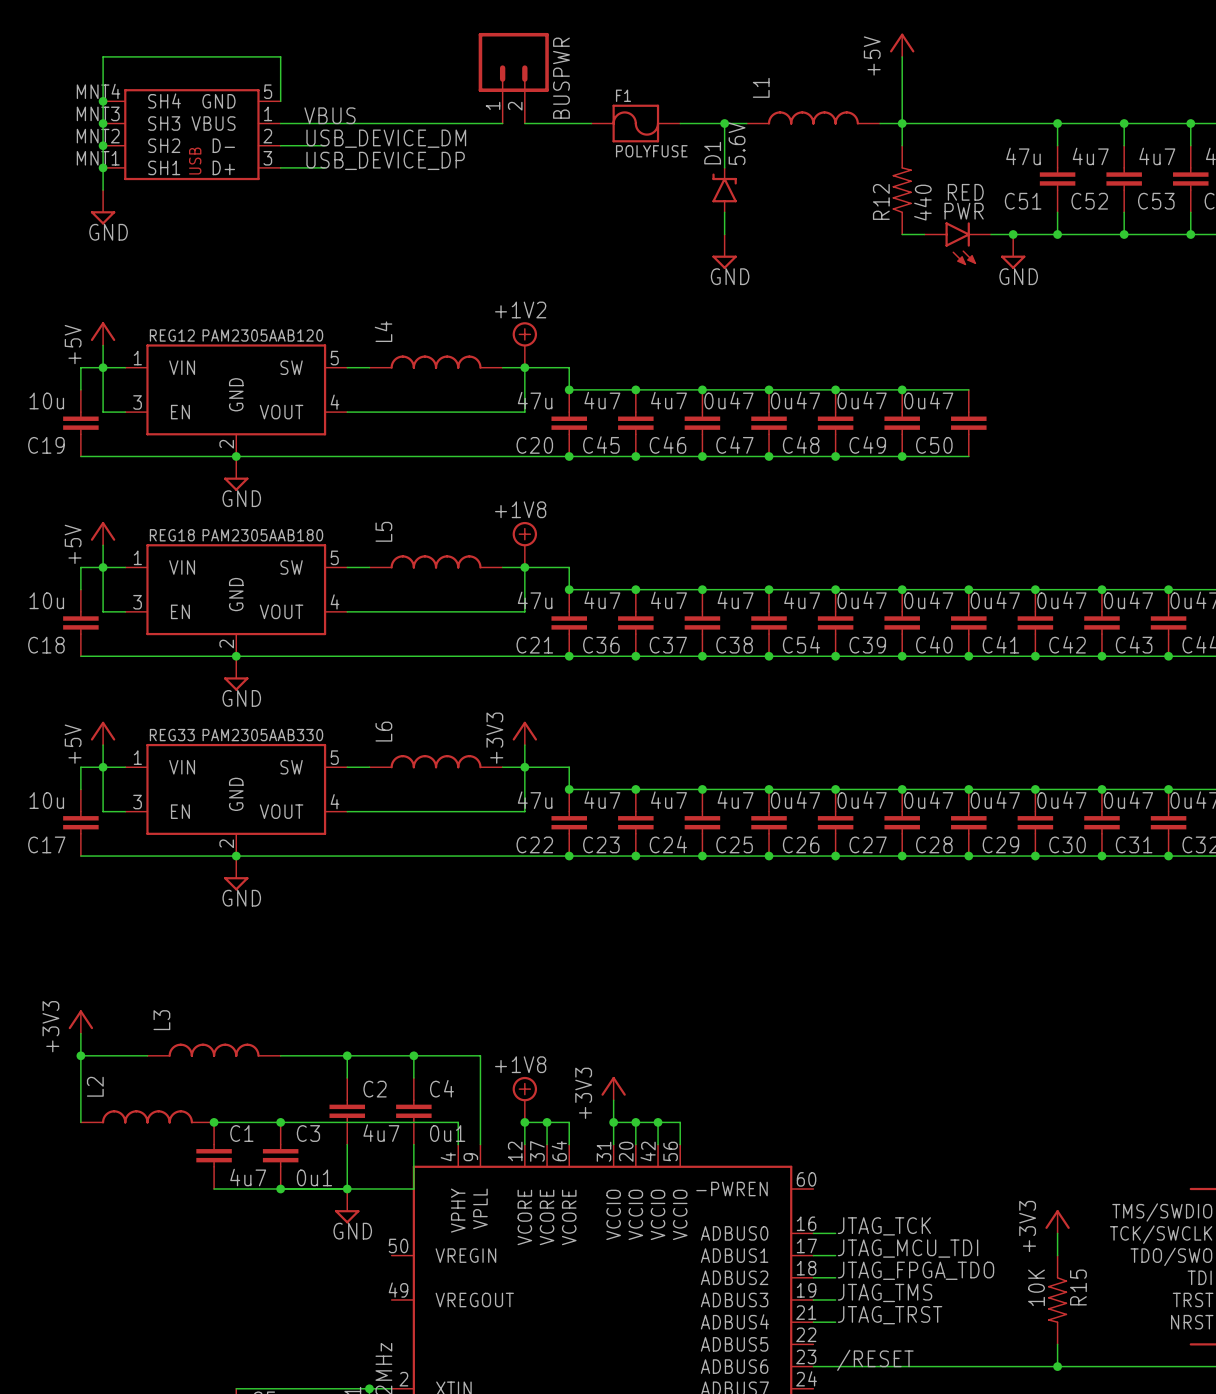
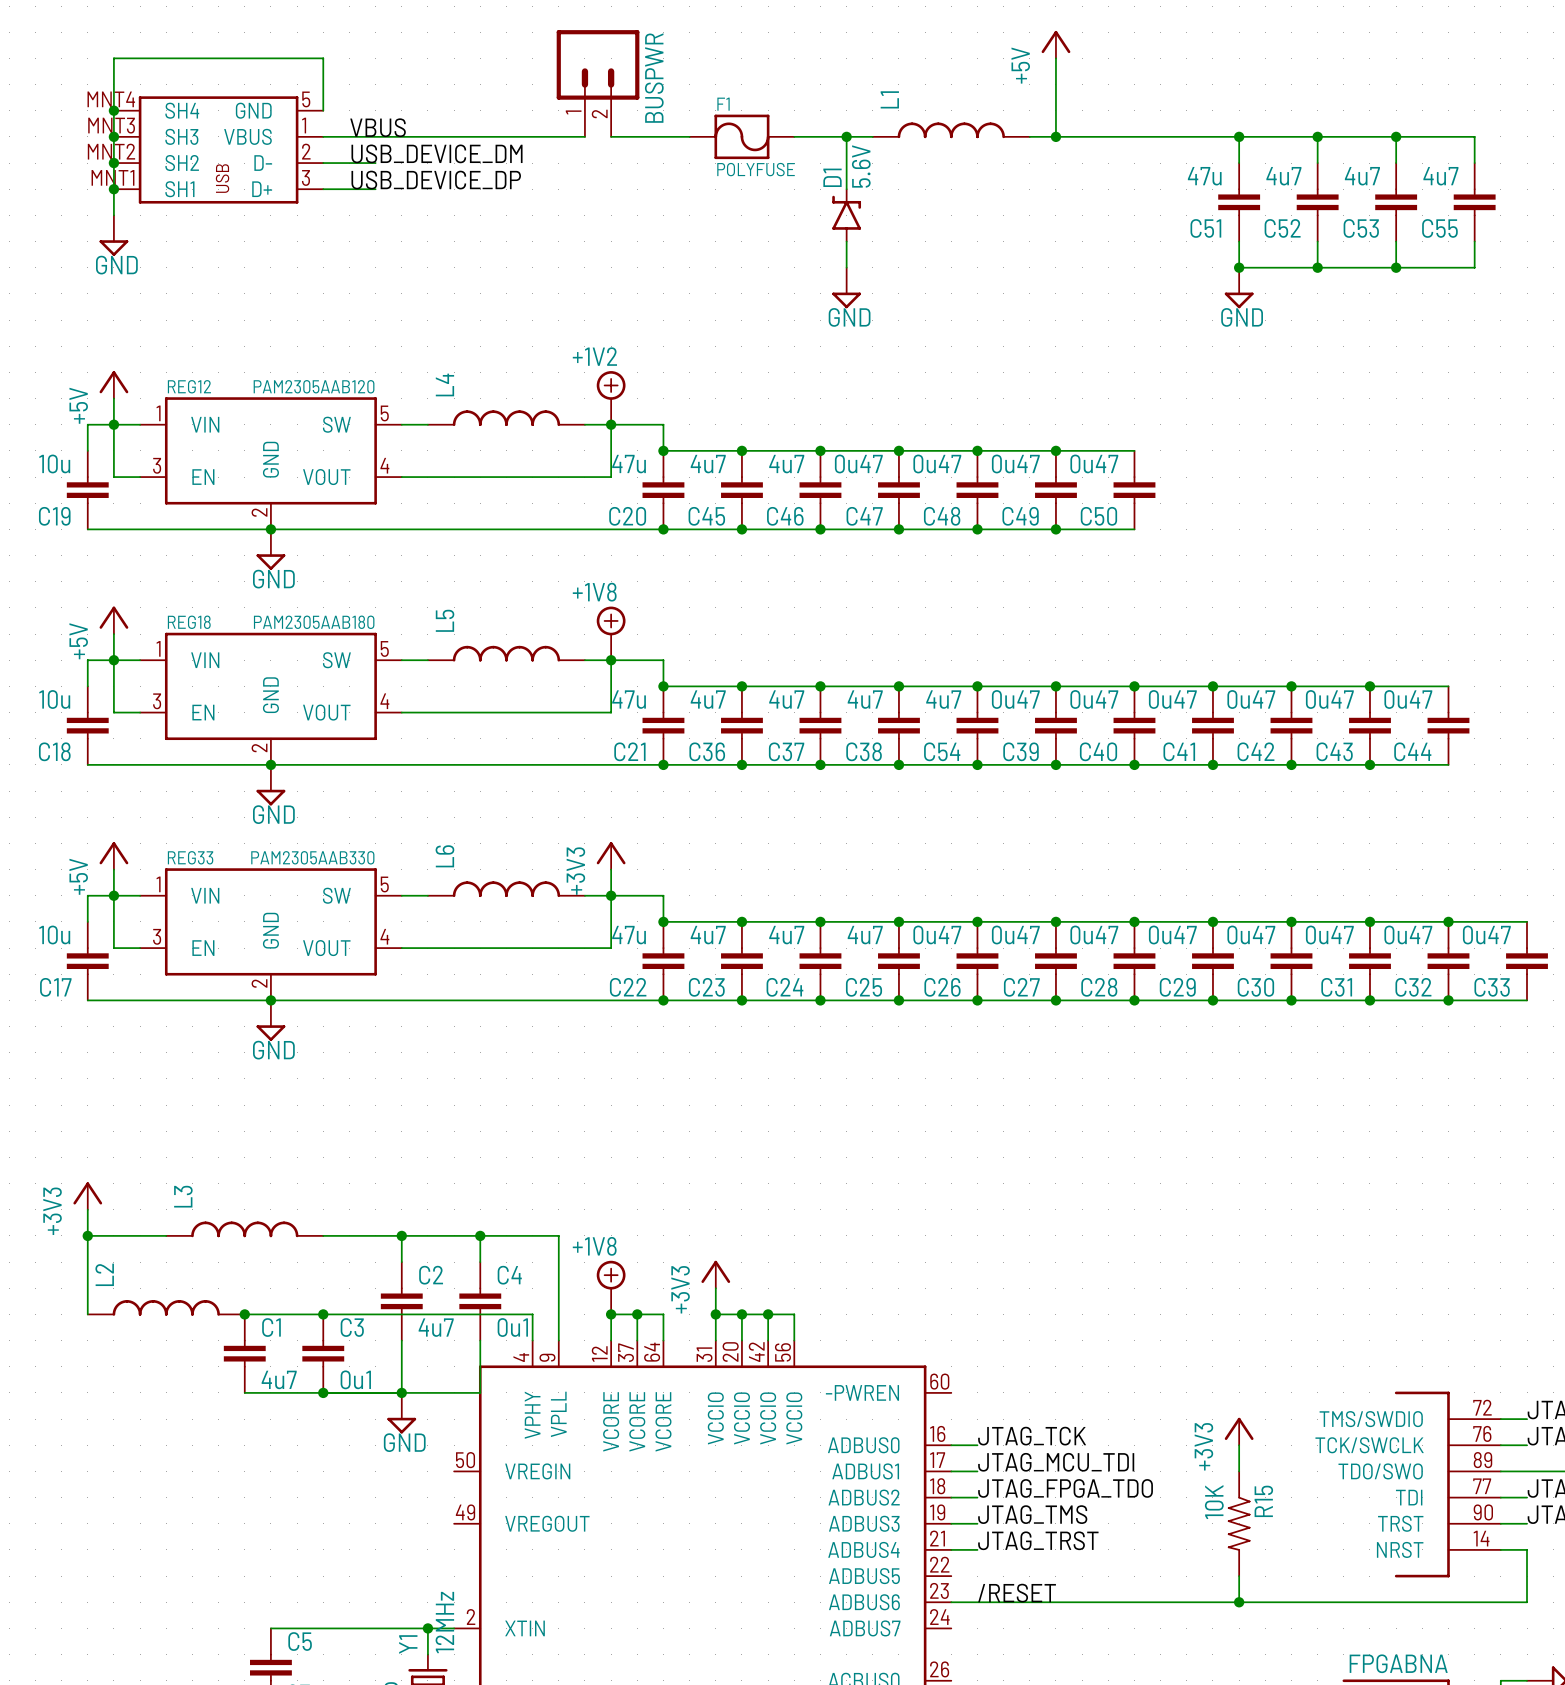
wire: (902, 123) (902, 145) -> none
R12: 440 (902, 190) -> none
wire: (902, 234) (924, 234) -> none
wire: (990, 234) (1057, 234) -> none
junction: (1013, 234) -> none
PWR: RED (957, 243) -> none
power symbol position: GND (1013, 251) -> GND (1239, 287)

